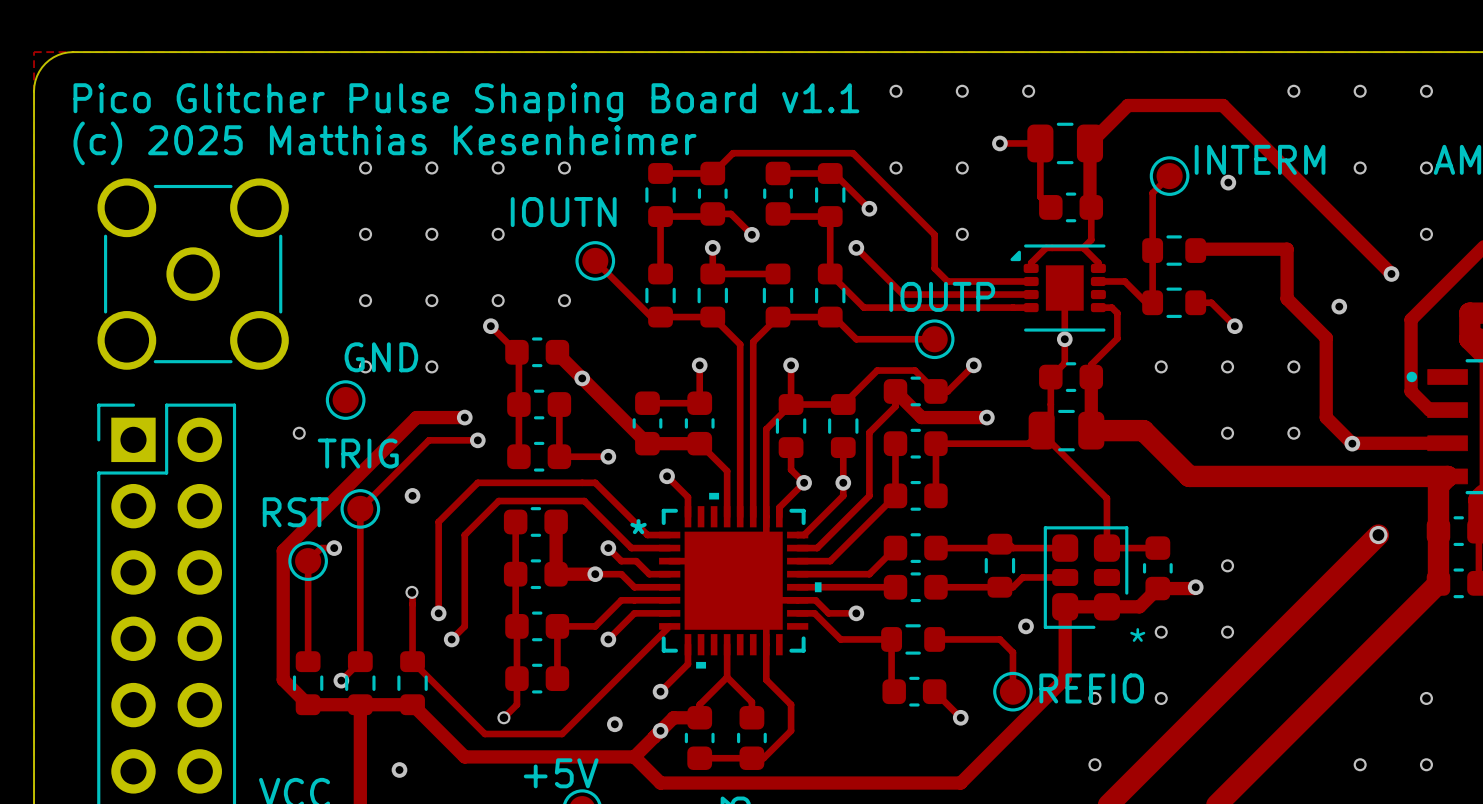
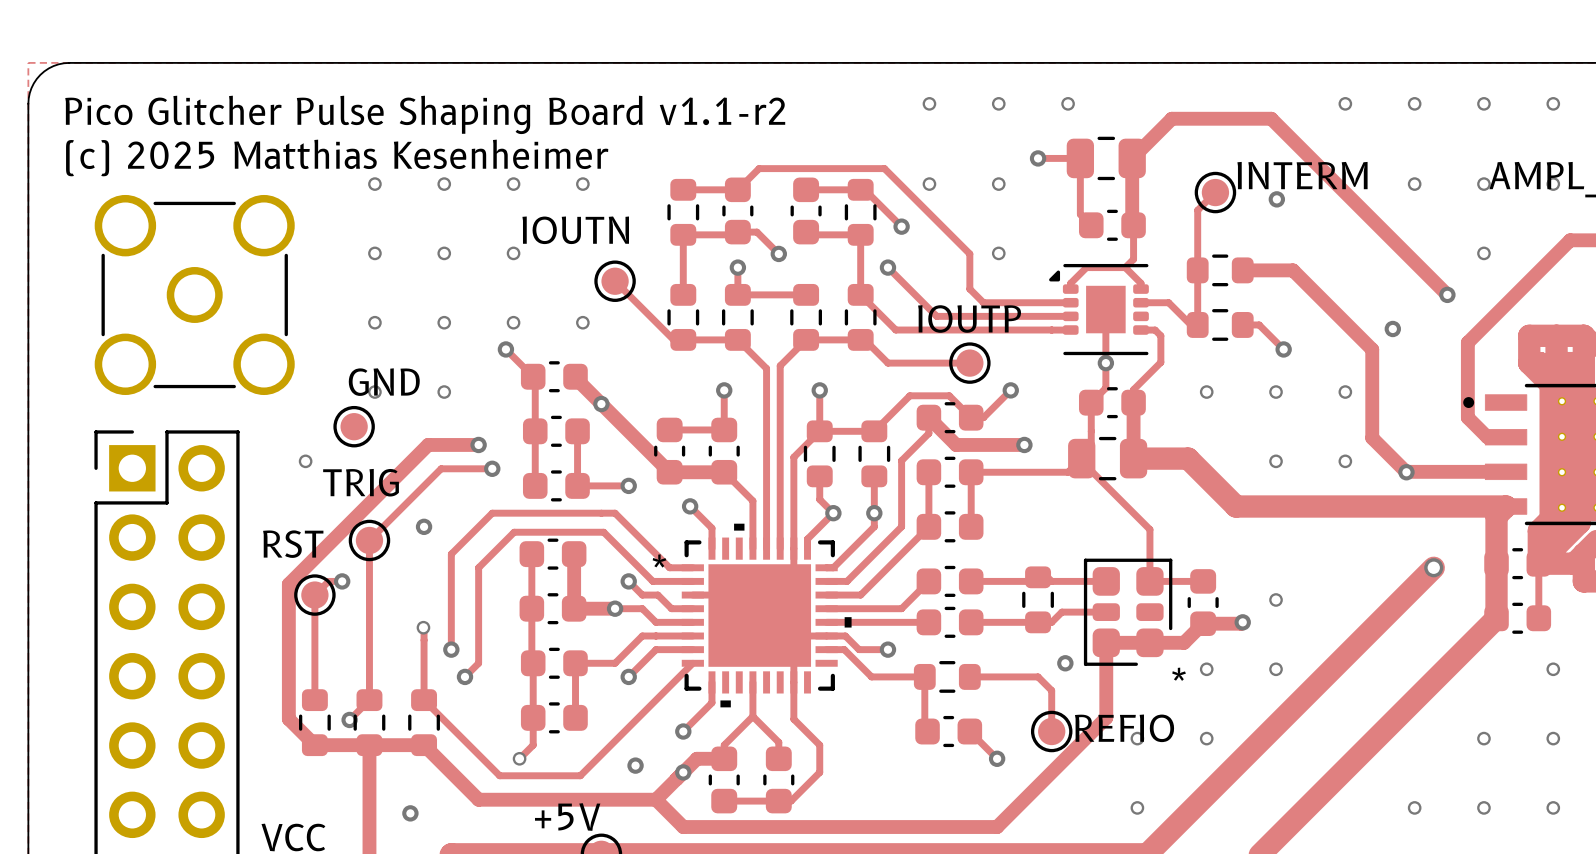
text: Pico Glitcher Pulse Shaping Board v1.1 (466, 102) -> Pico Glitcher Pulse Shaping Board v1.1-r2 (425, 114)
track: (1197, 249) (1287, 249) (1287, 298) (1326, 337) (1326, 417) -> (1242, 270) (1293, 270) (1372, 349) (1372, 438) (1379, 444)

